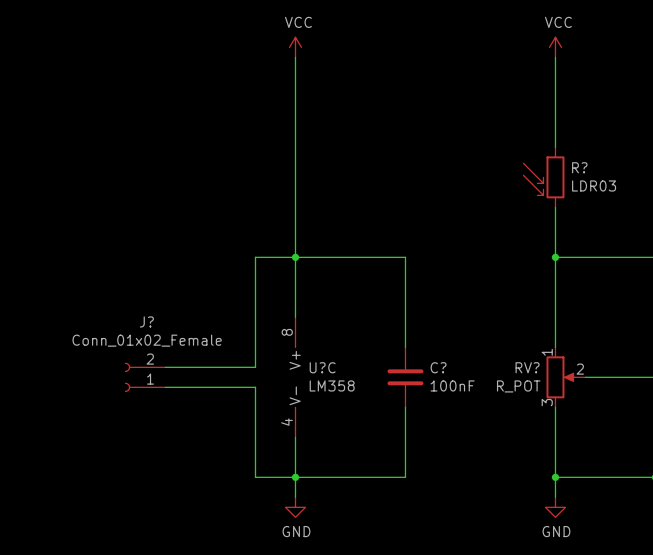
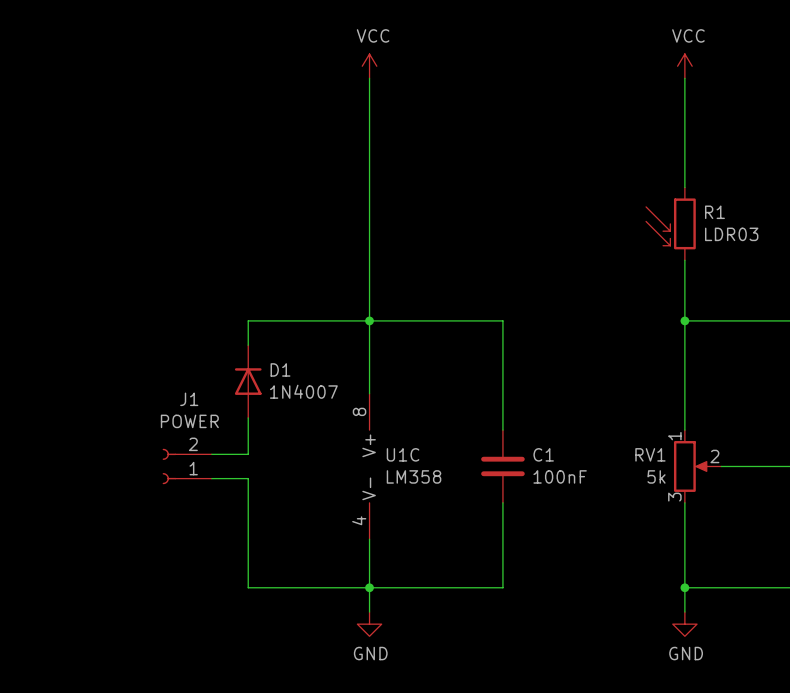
R? name: R? (579, 167) -> R1 (714, 212)
wire: (255, 257) (255, 367) (195, 367) -> (321, 320) (248, 320) (248, 345)
D1: none -> 1N4007 (248, 381)
J? name: J? (146, 321) -> J1 (189, 399)
wire: none -> (248, 417) (248, 454)
J? value: Conn_01x02_Female (147, 340) -> POWER (189, 421)
U?C name: U?C (322, 367) -> U1C (403, 454)
C? name: C? (438, 367) -> C1 (543, 454)
RV? name: RV? (527, 367) -> RV1 (650, 454)
RV? value: R_POT (518, 386) -> 5k (656, 476)
wire: (195, 387) (255, 387) (255, 477) -> (248, 478) (248, 587) (321, 587)

